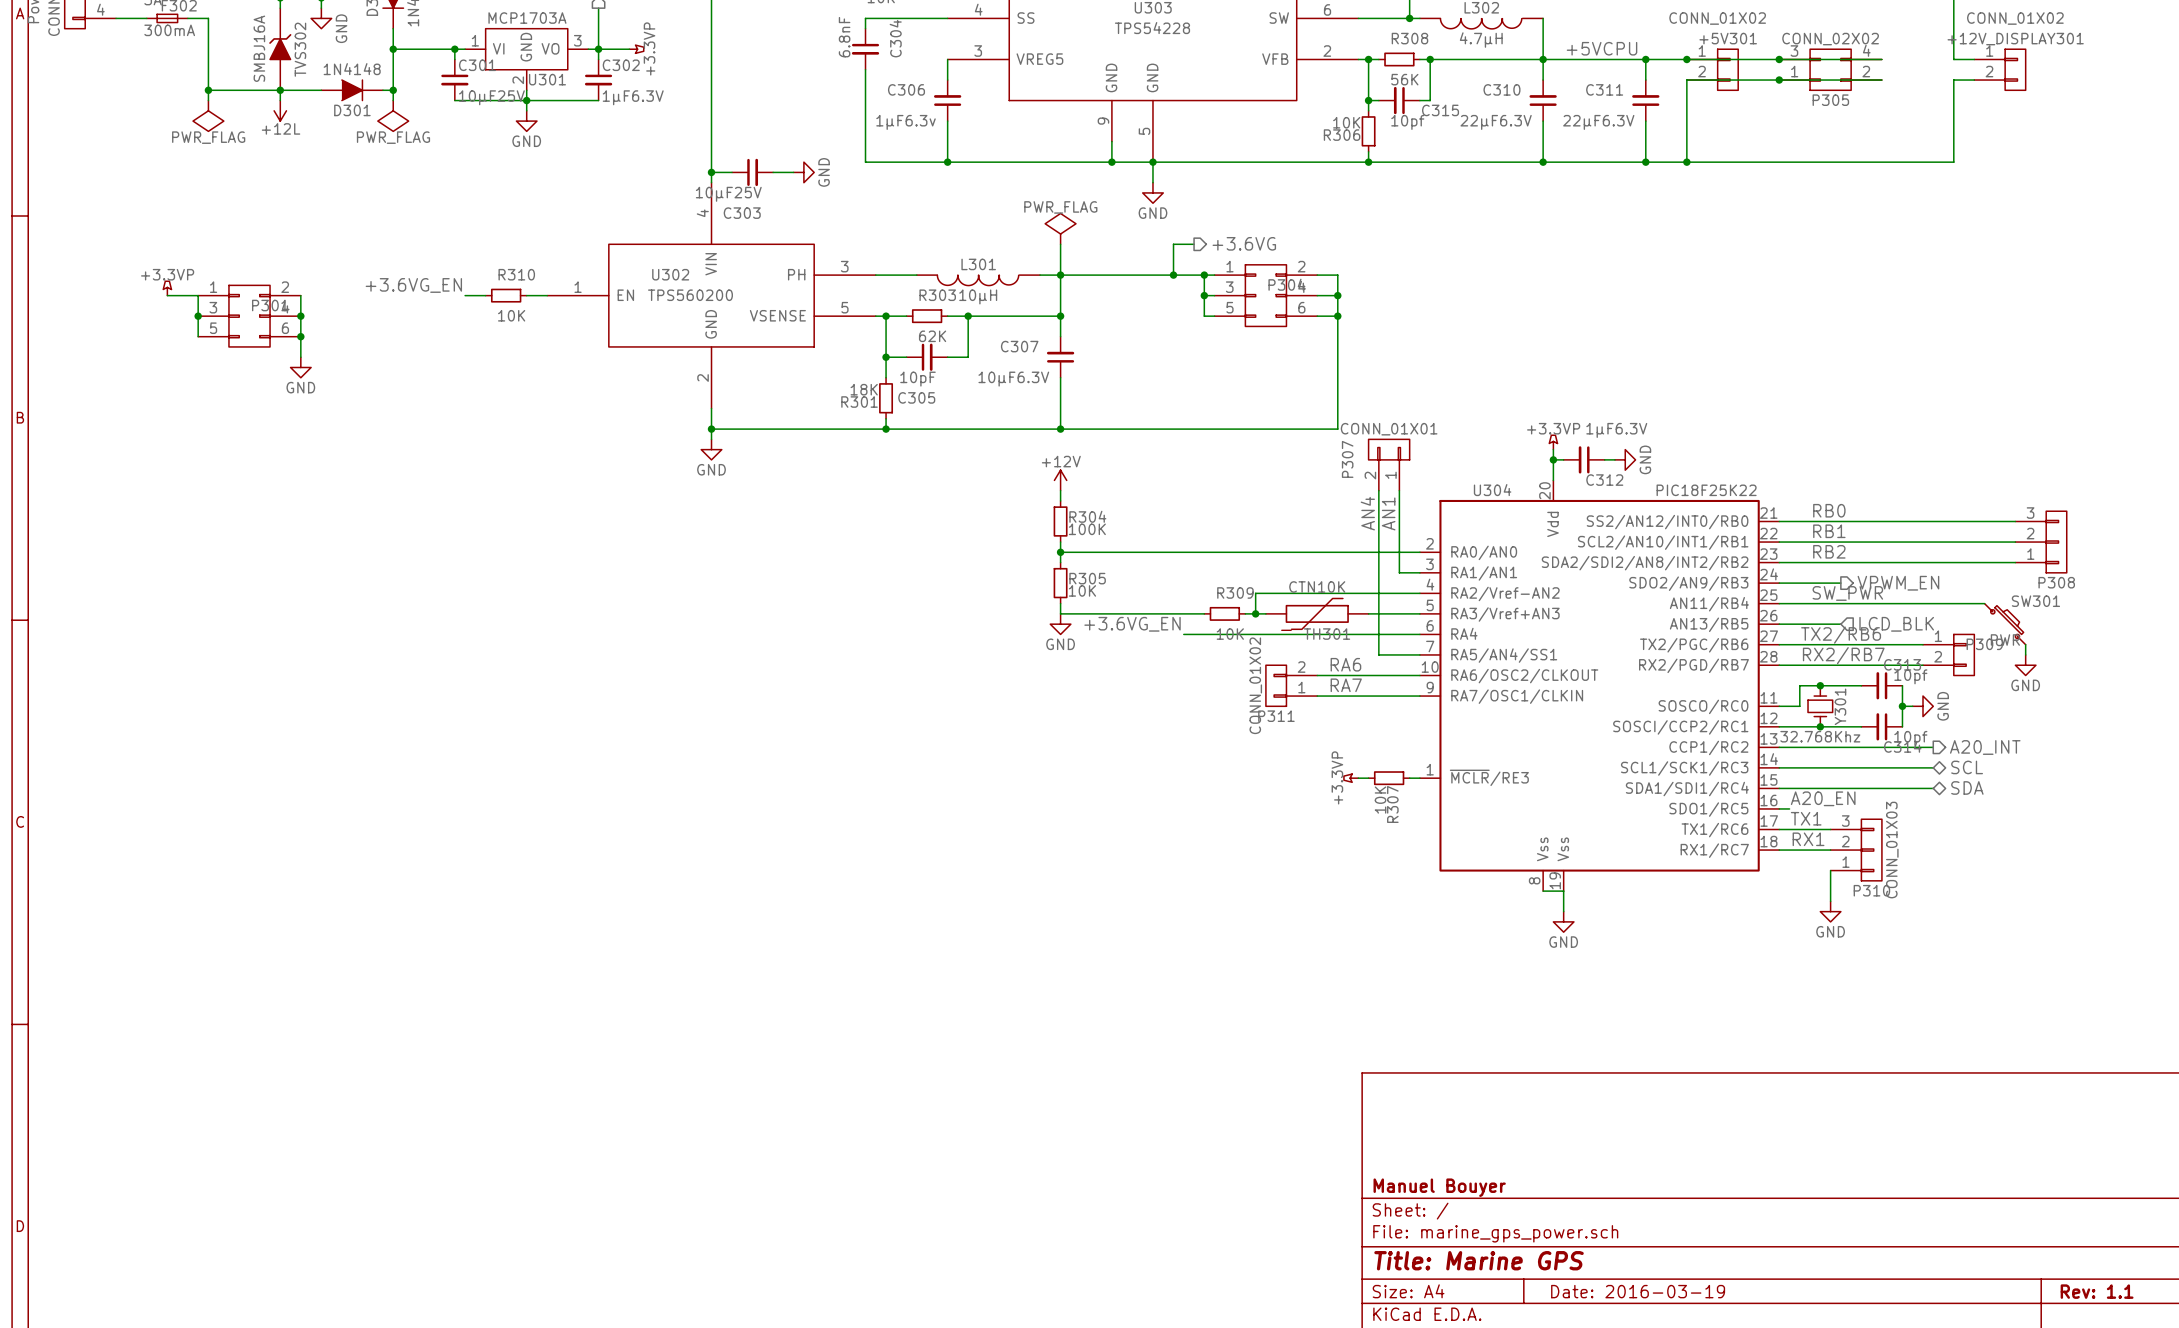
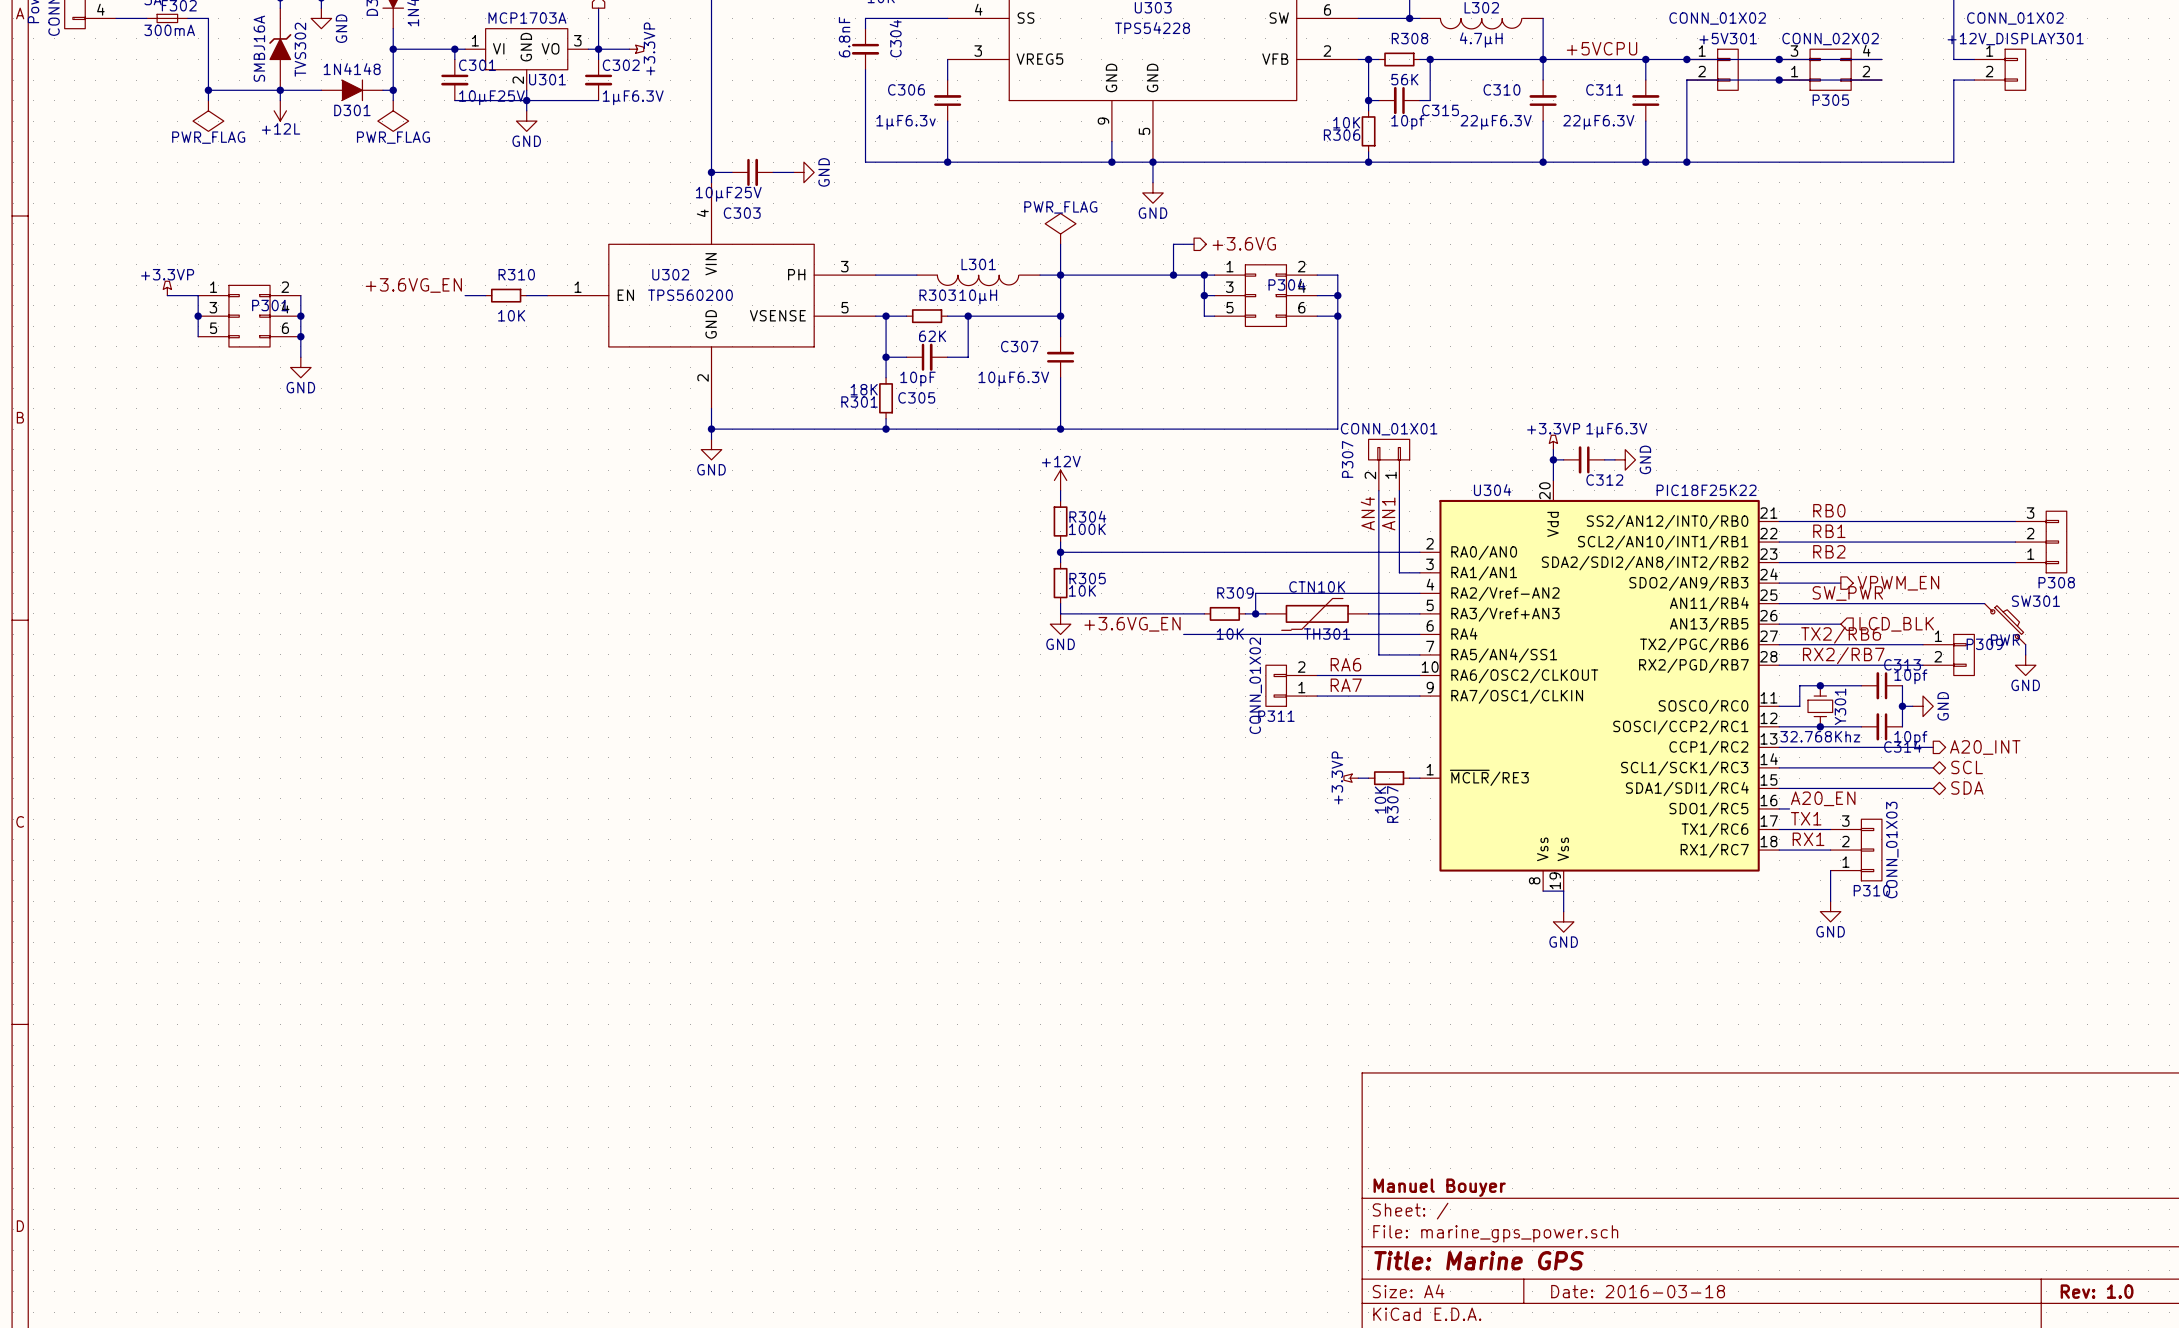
title block: Date: 2016-03-19 (1638, 1291) -> Date: 2016-03-18 (1638, 1291)
title block: Rev: 1.1 (2097, 1291) -> Rev: 1.0 (2097, 1291)

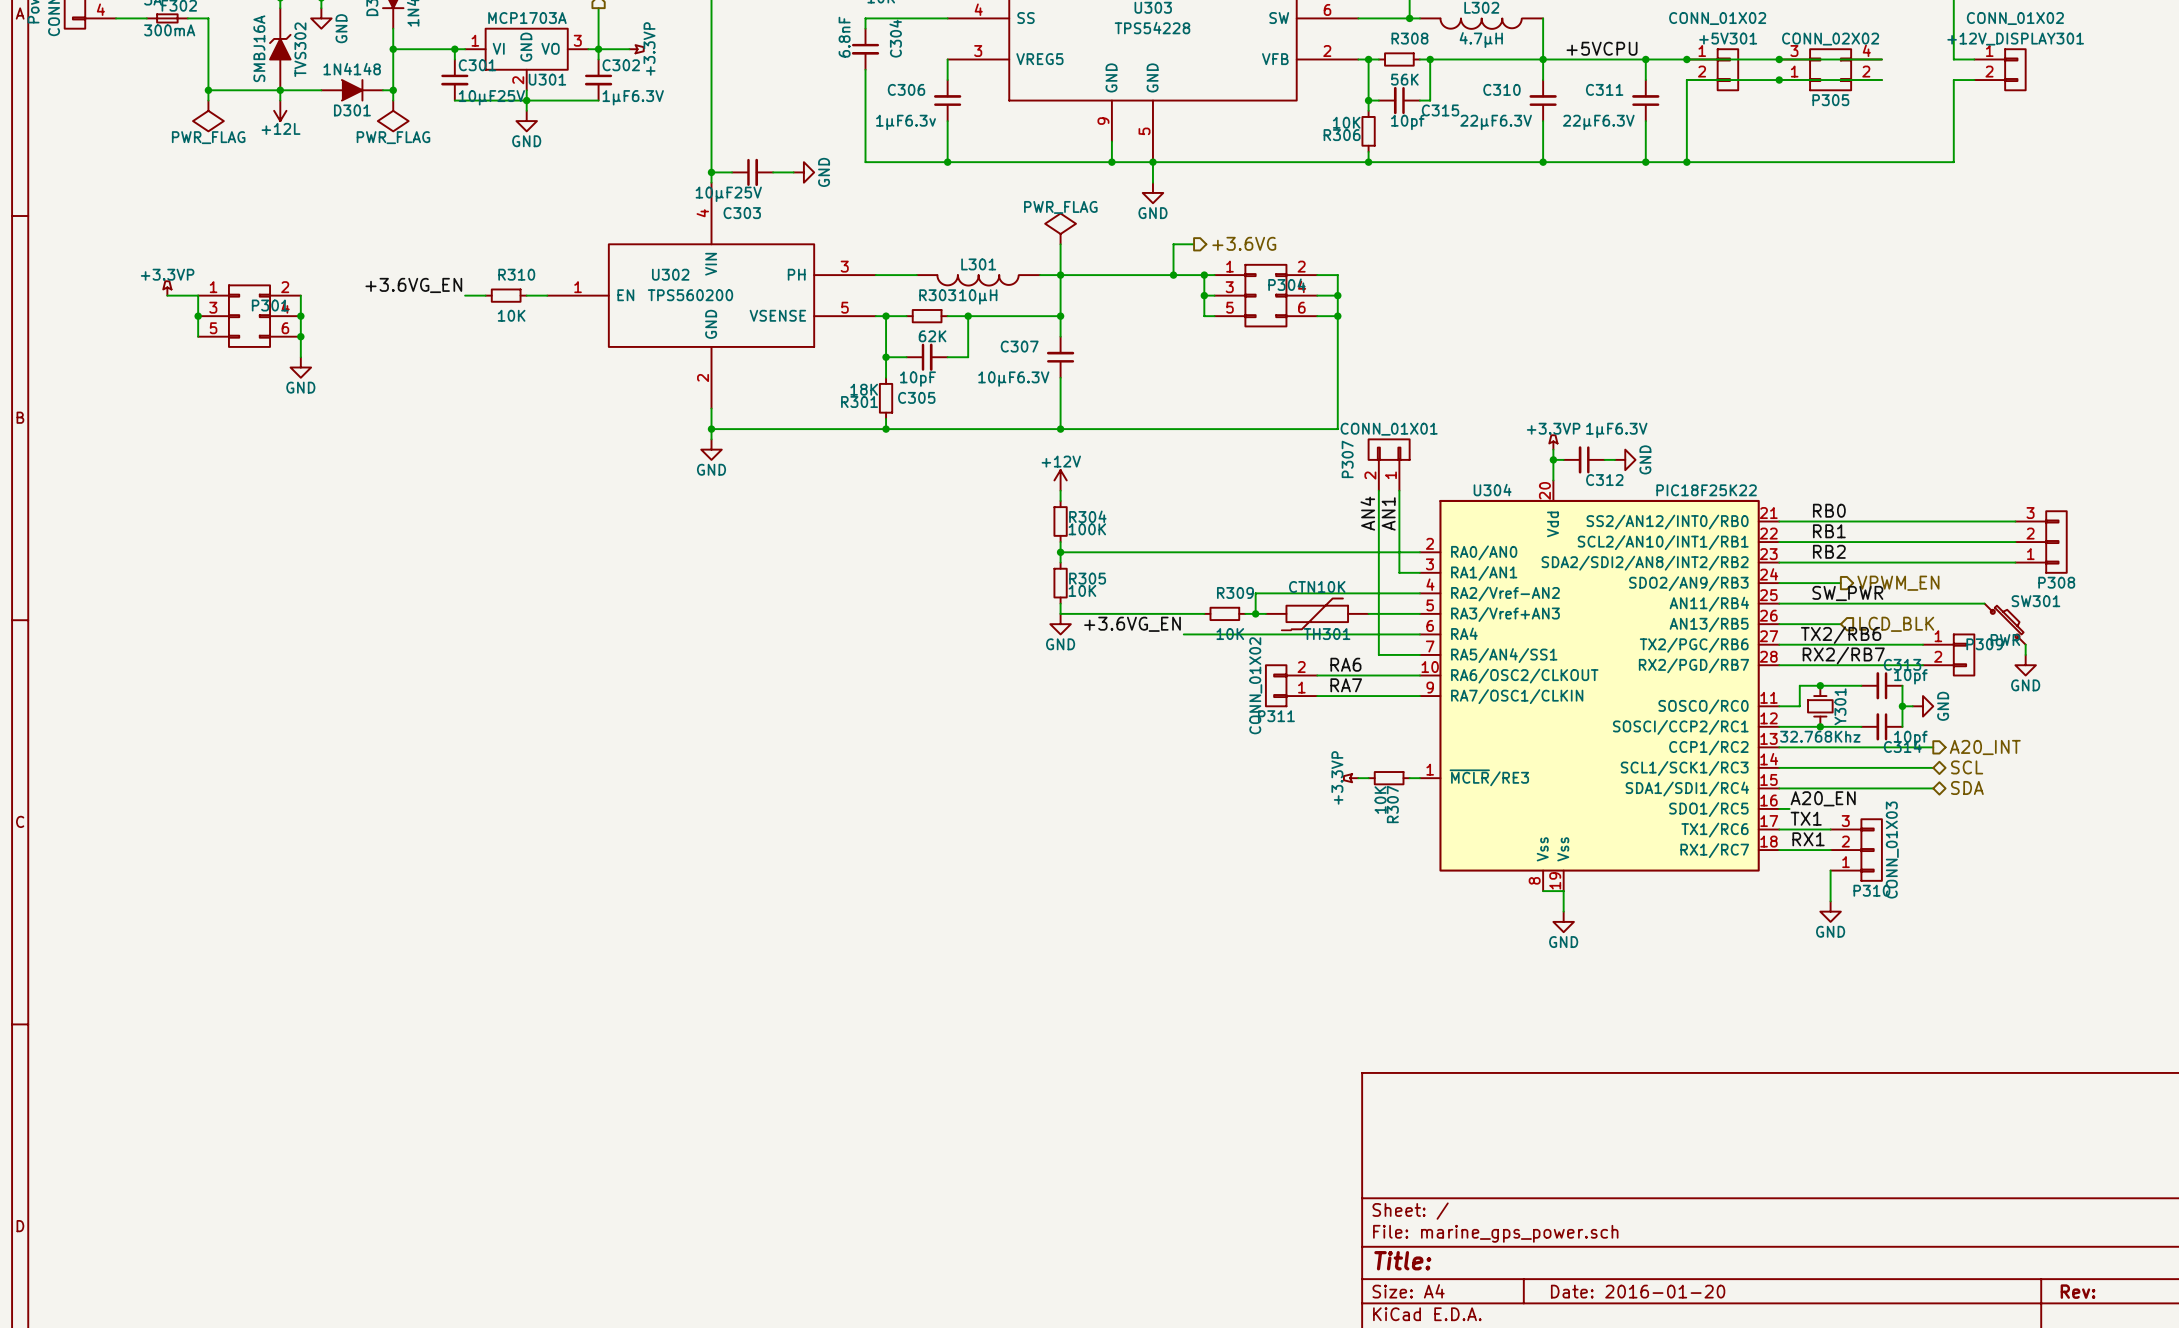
title block: Manuel Bouyer (1439, 1187) -> none
title block: Title: Marine GPS (1479, 1260) -> Title: (1402, 1260)
title block: Date: 2016-03-18 (1638, 1291) -> Date: 2016-01-20 (1638, 1291)
title block: Rev: 1.0 (2097, 1291) -> Rev: (2078, 1291)

